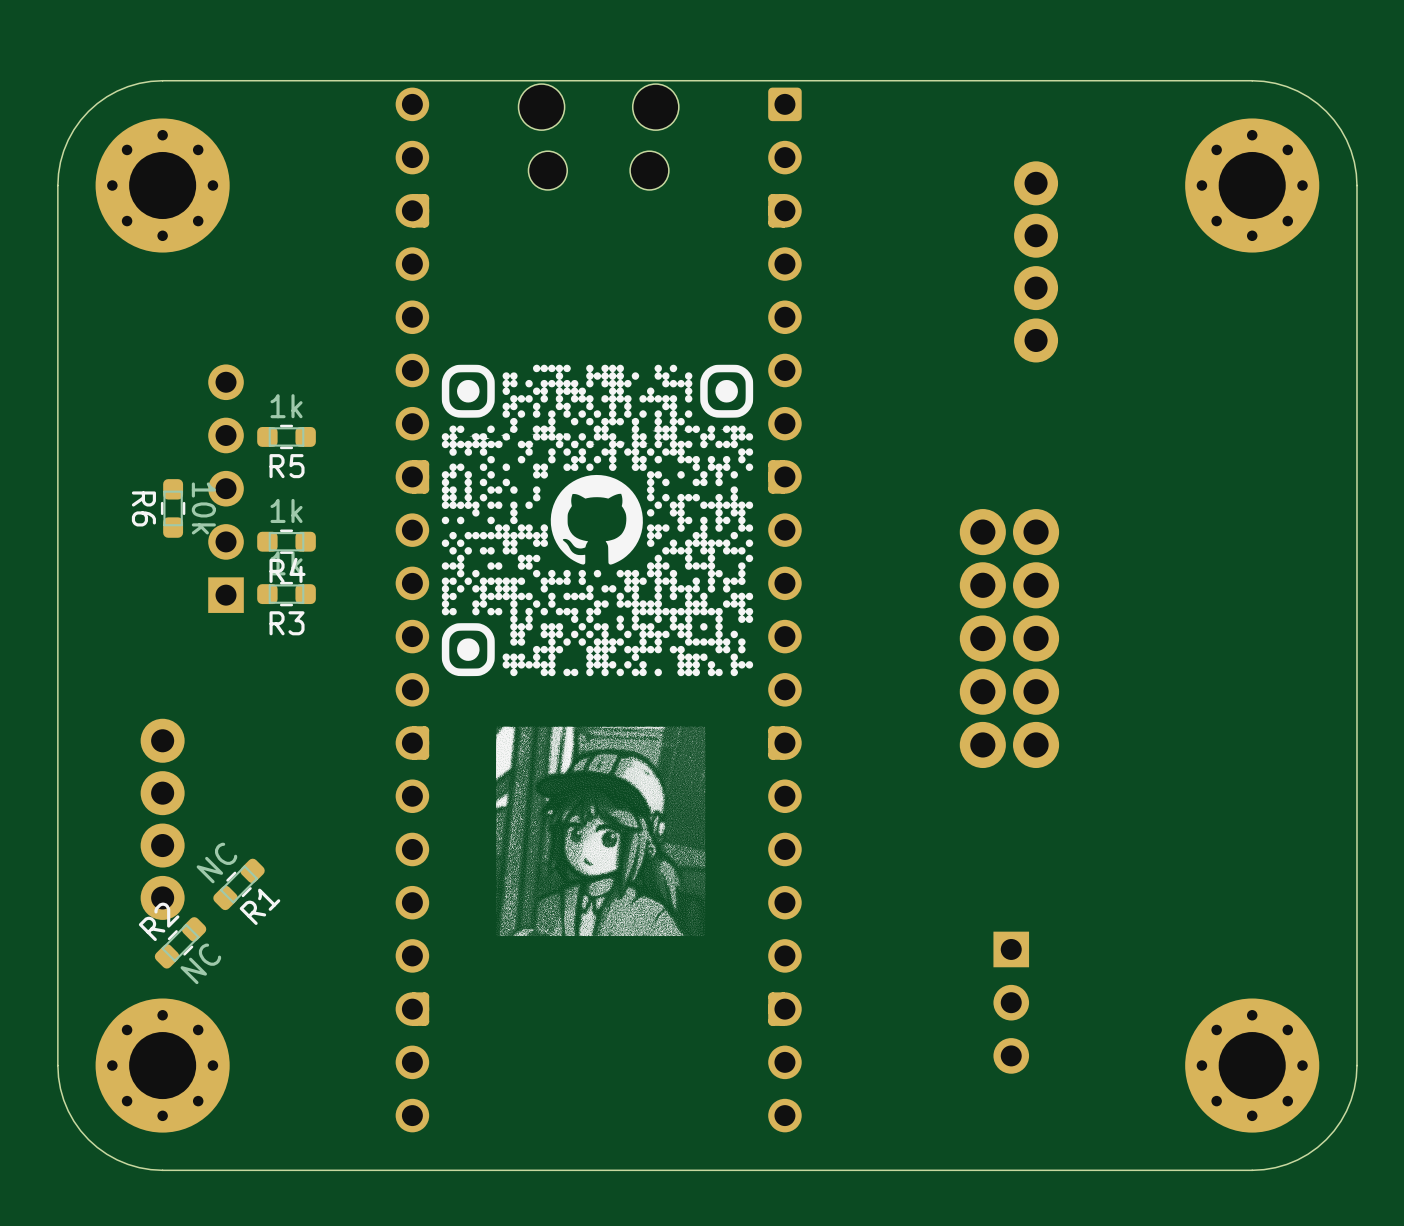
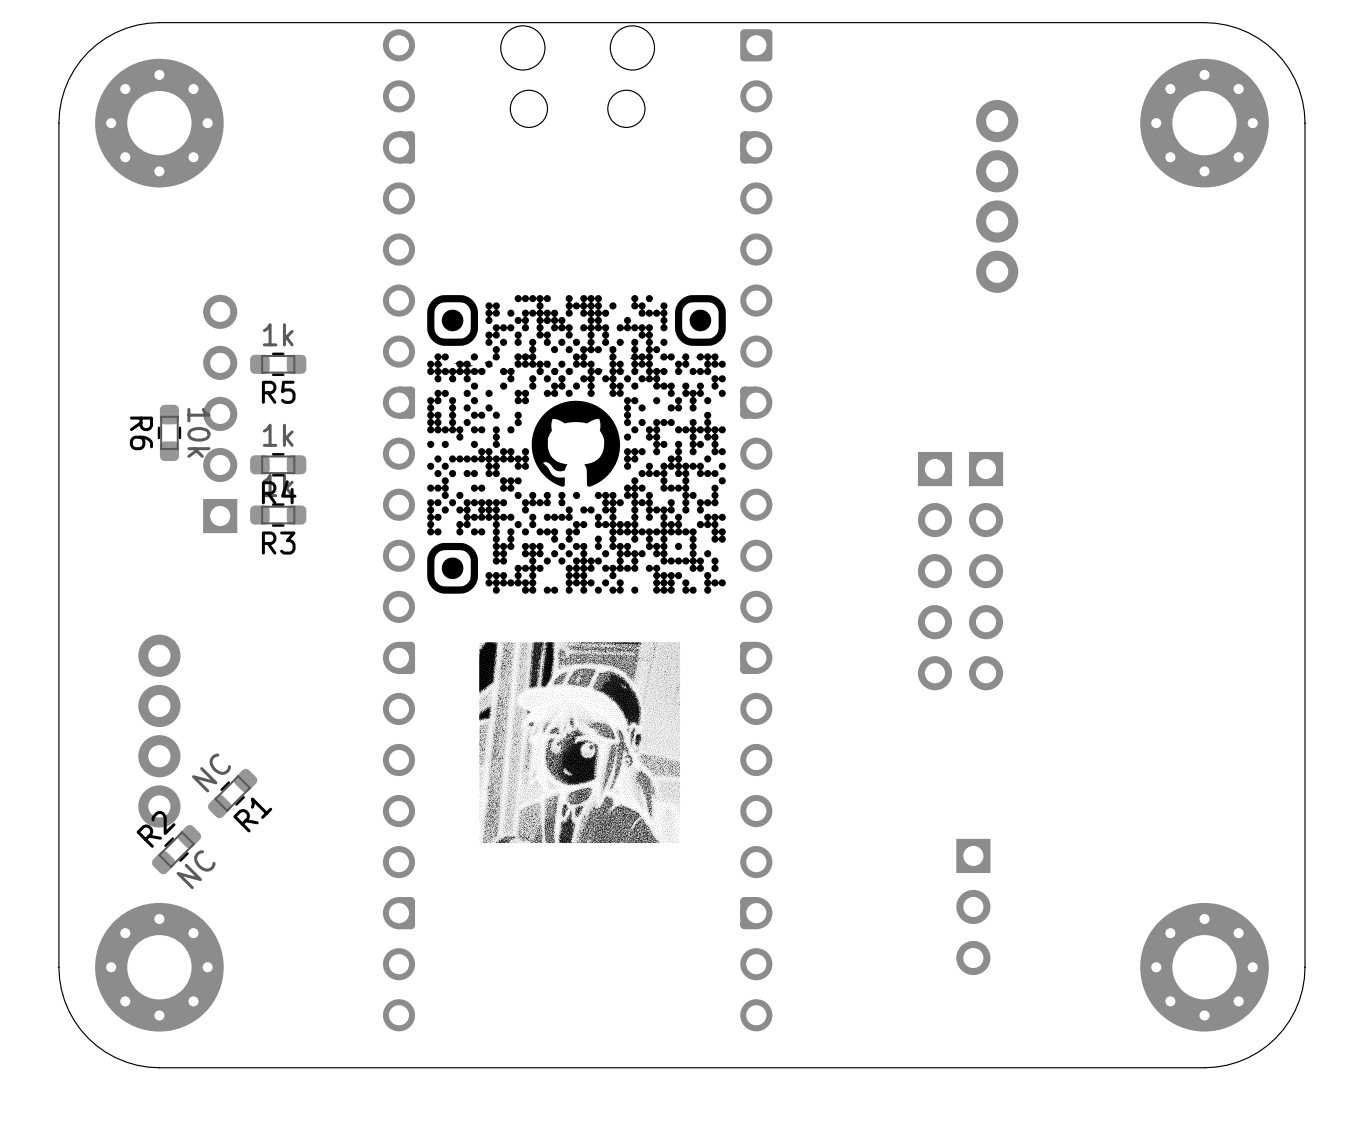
part: (1009, 638) -> none
part: none -> (934, 571)
part: none -> (986, 571)

